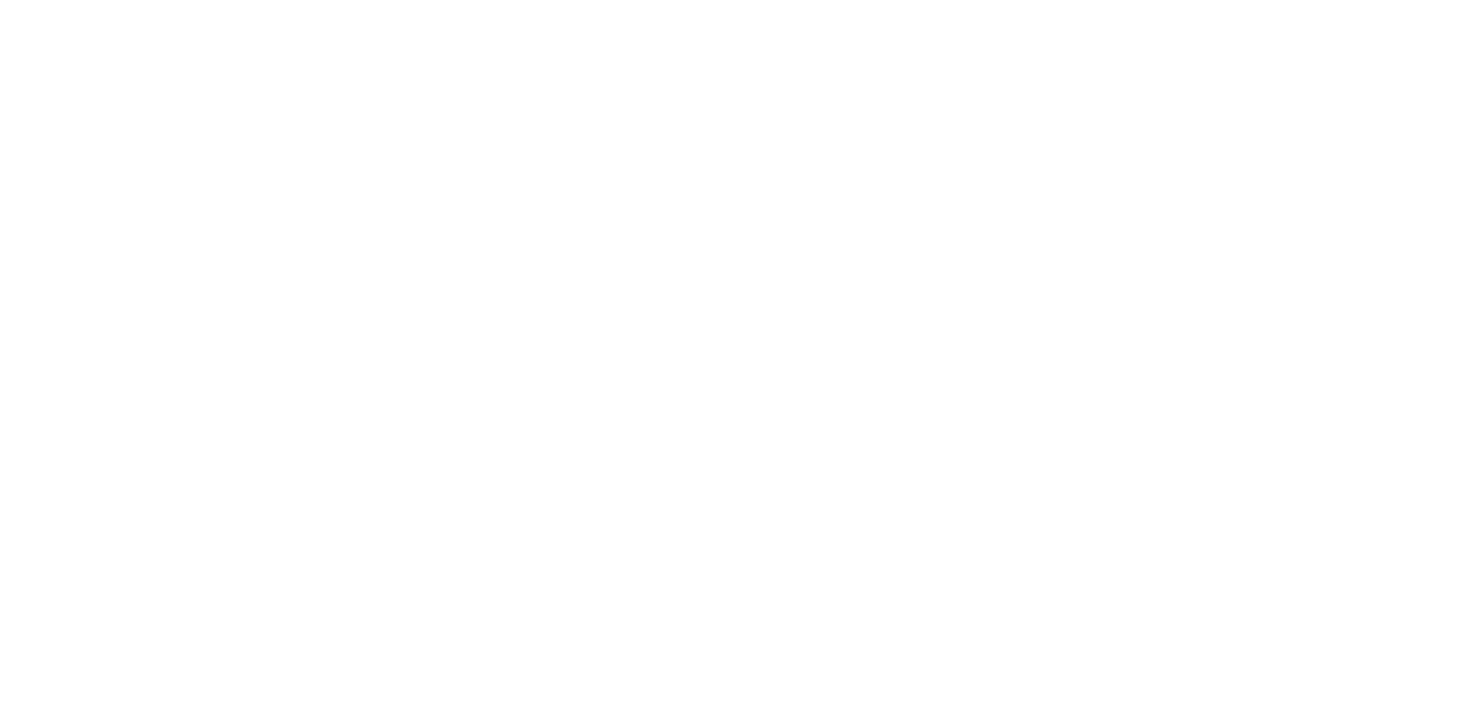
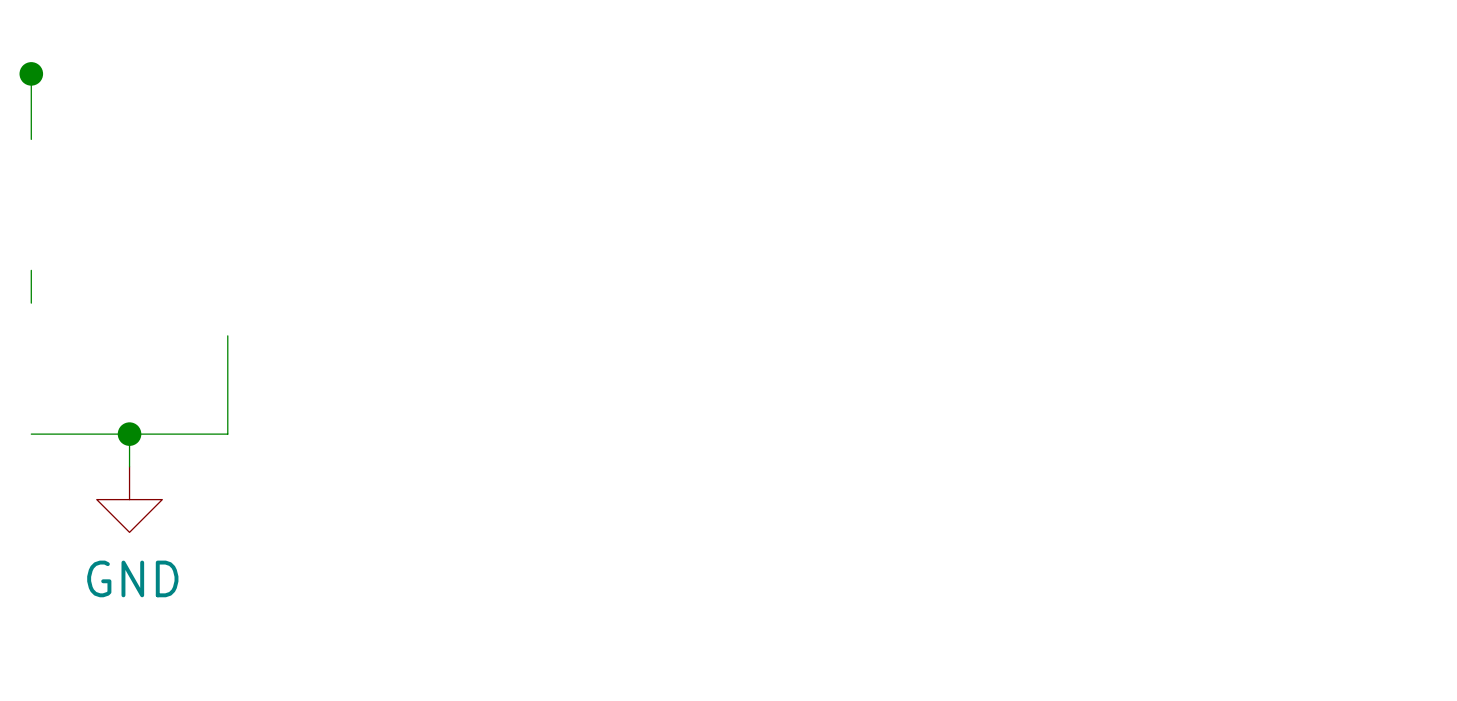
wire: none -> (31, 73) (31, 139)
junction: none -> (31, 73)
wire: none -> (31, 270) (31, 303)
wire: none -> (227, 335) (227, 434) (31, 434)
wire: none -> (129, 434) (129, 466)
junction: none -> (129, 434)
power symbol: none -> GND (129, 499)

